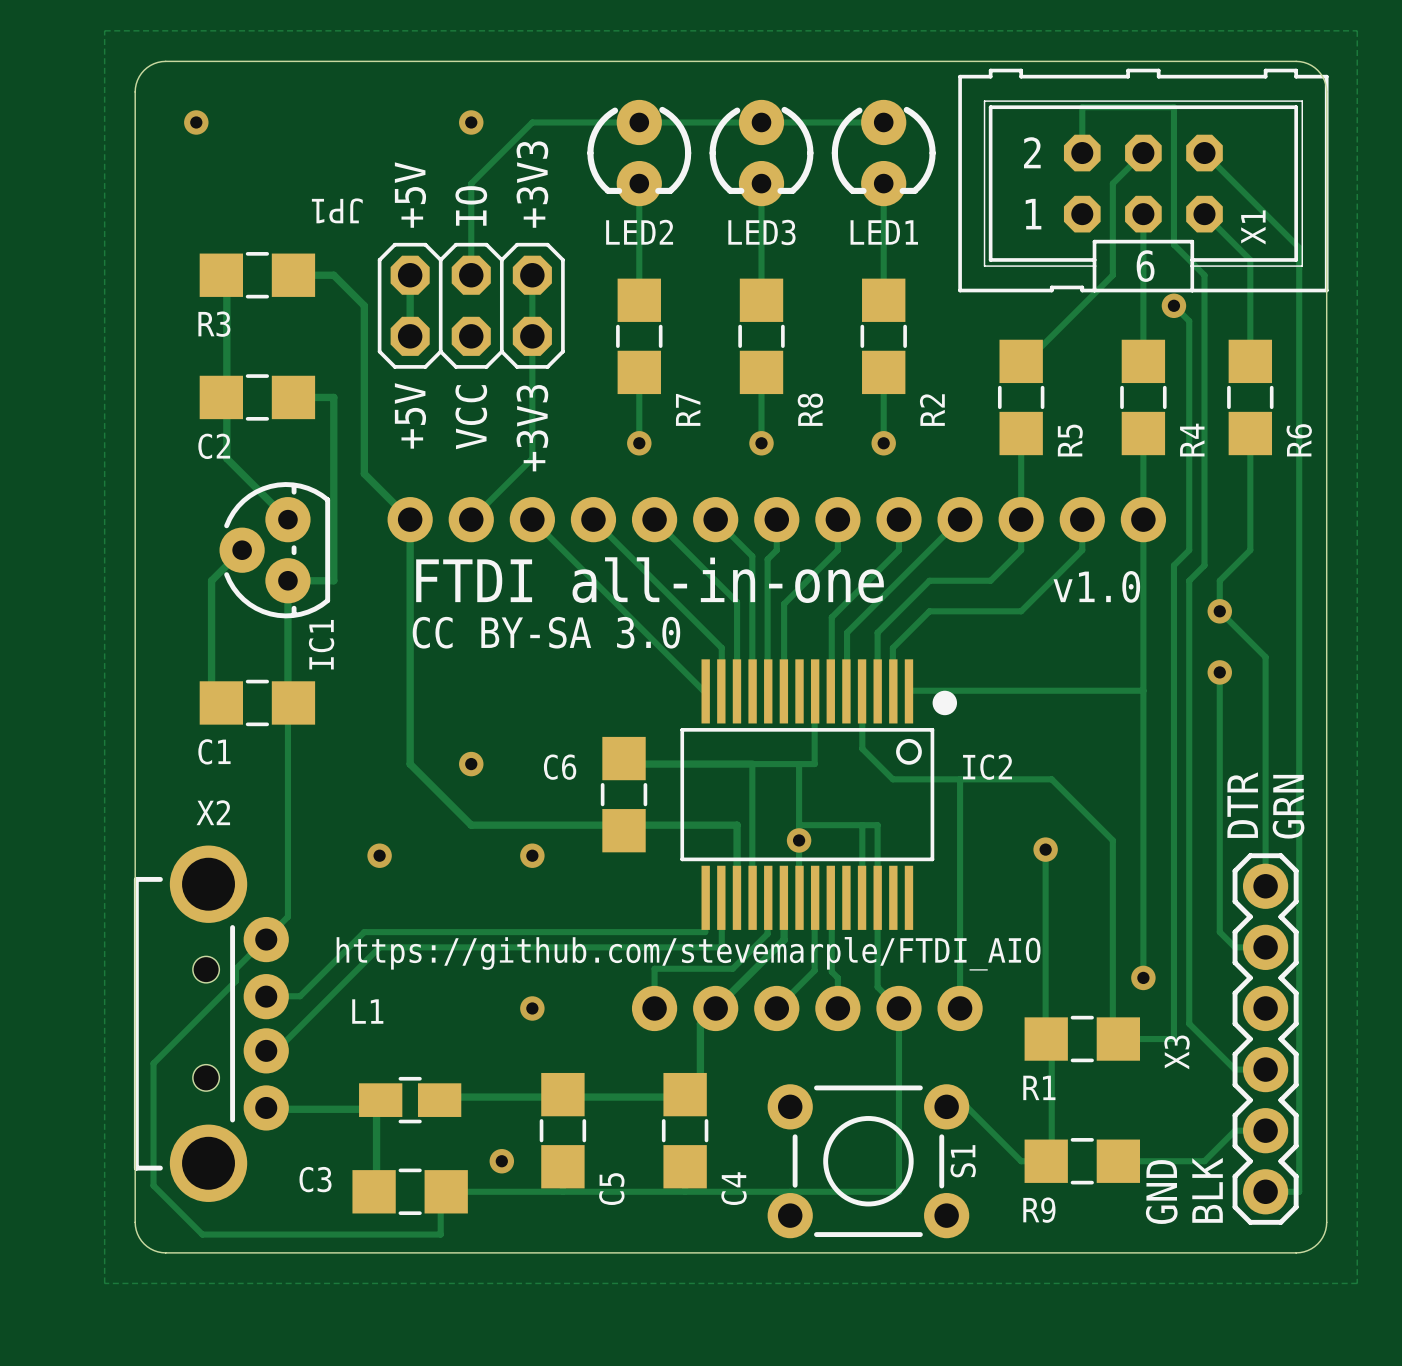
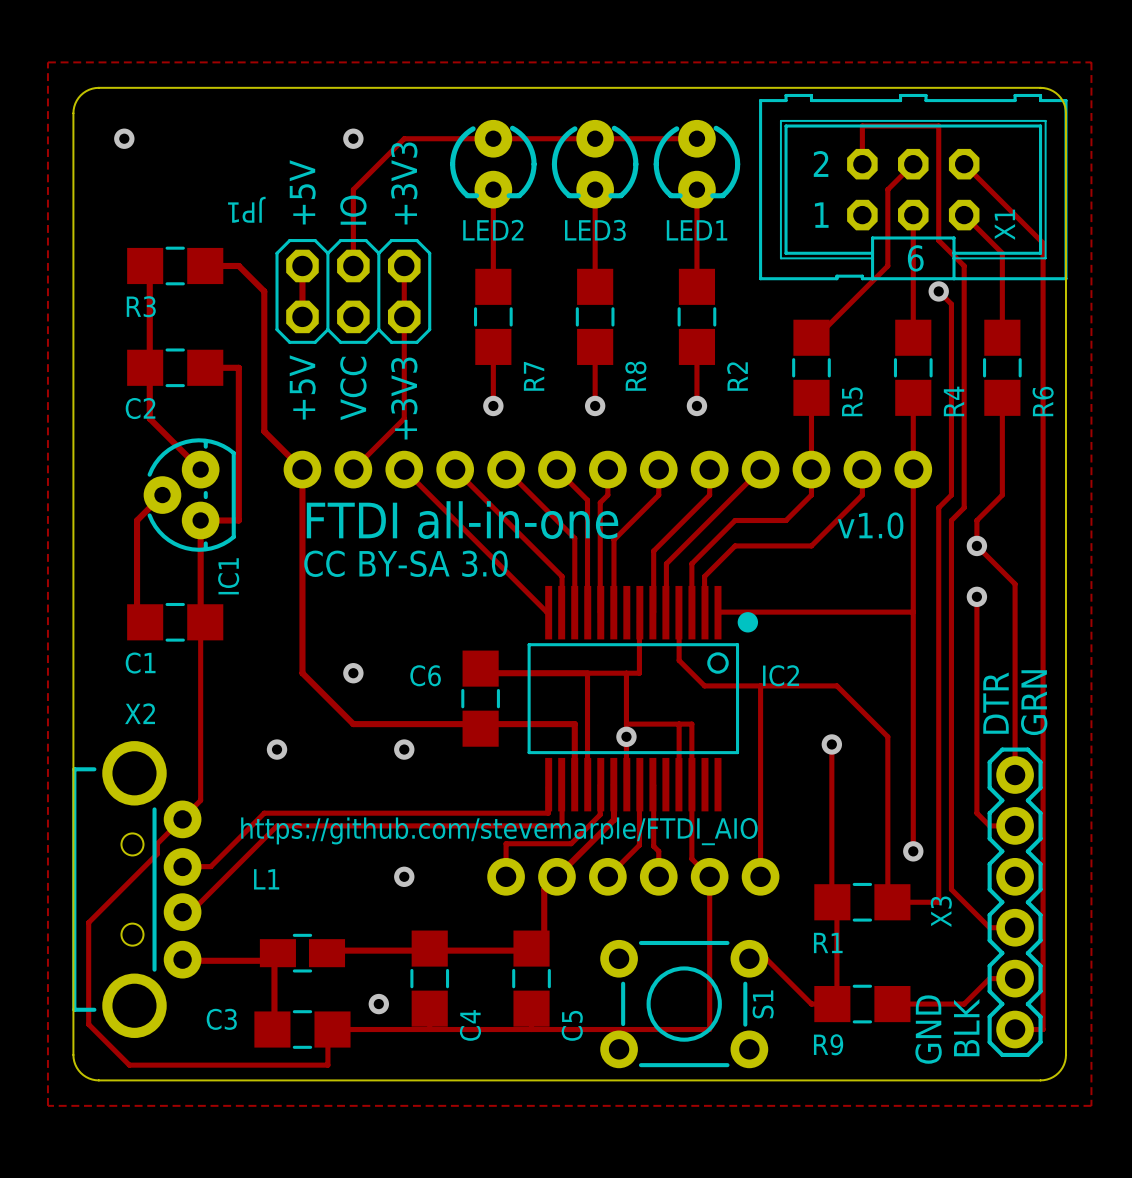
C4 name: C4 (734, 1188) -> C5 (572, 1025)
C5 name: C5 (611, 1189) -> C4 (470, 1025)

